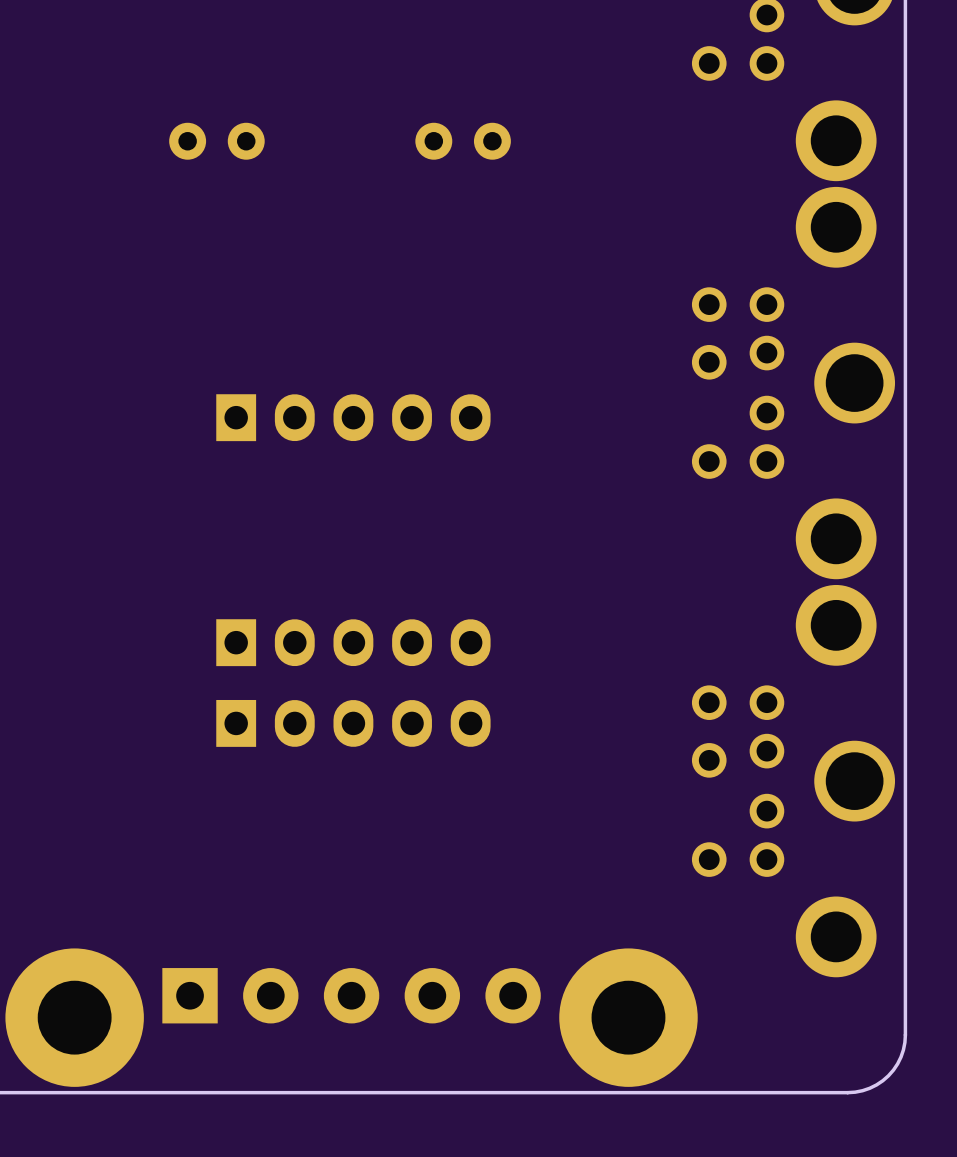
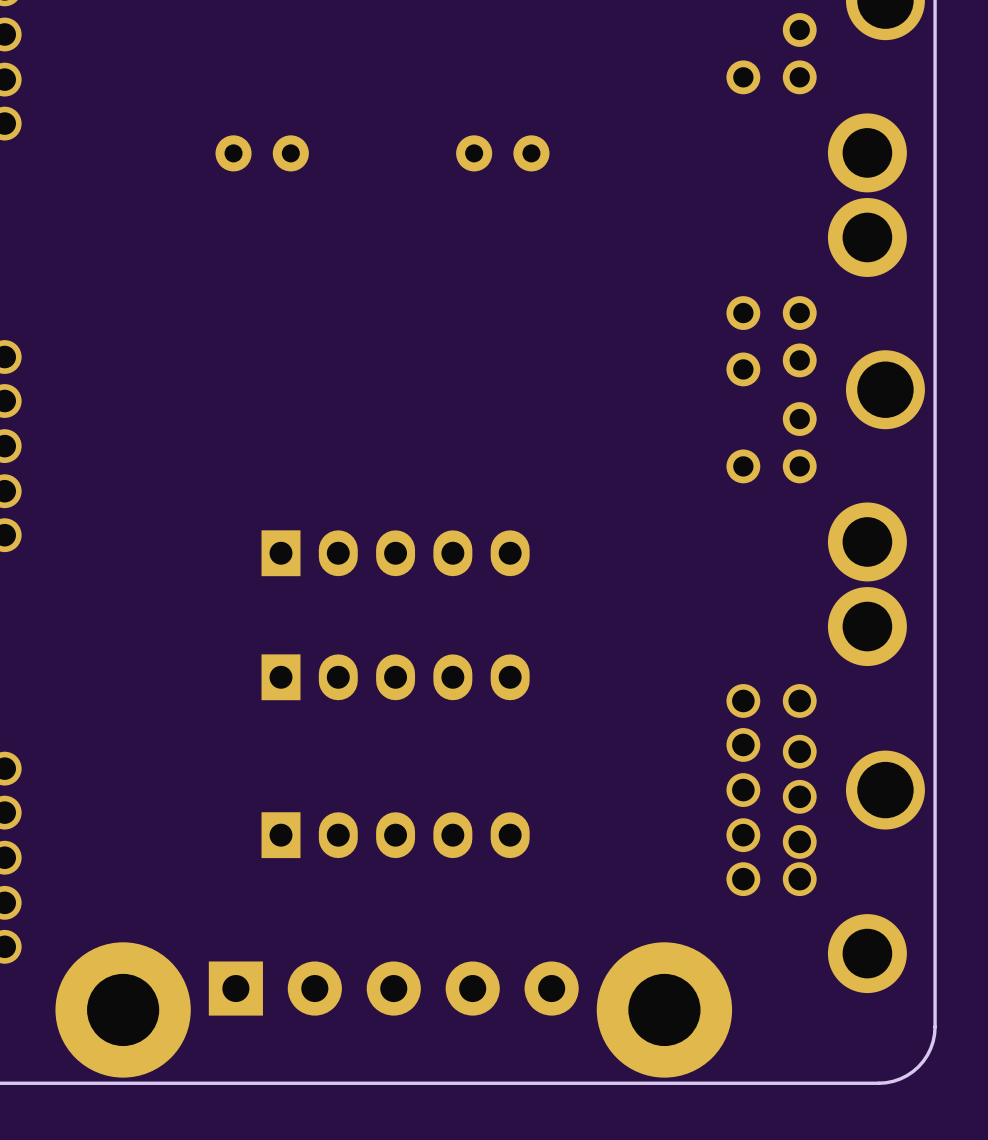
part: (353, 417) -> none
part: none -> (395, 553)
part footprint: [691, 584, 896, 978] -> [726, 587, 925, 994]
part: (353, 642) -> none
part: none -> (395, 677)
part: (353, 723) -> none
part: none -> (395, 835)

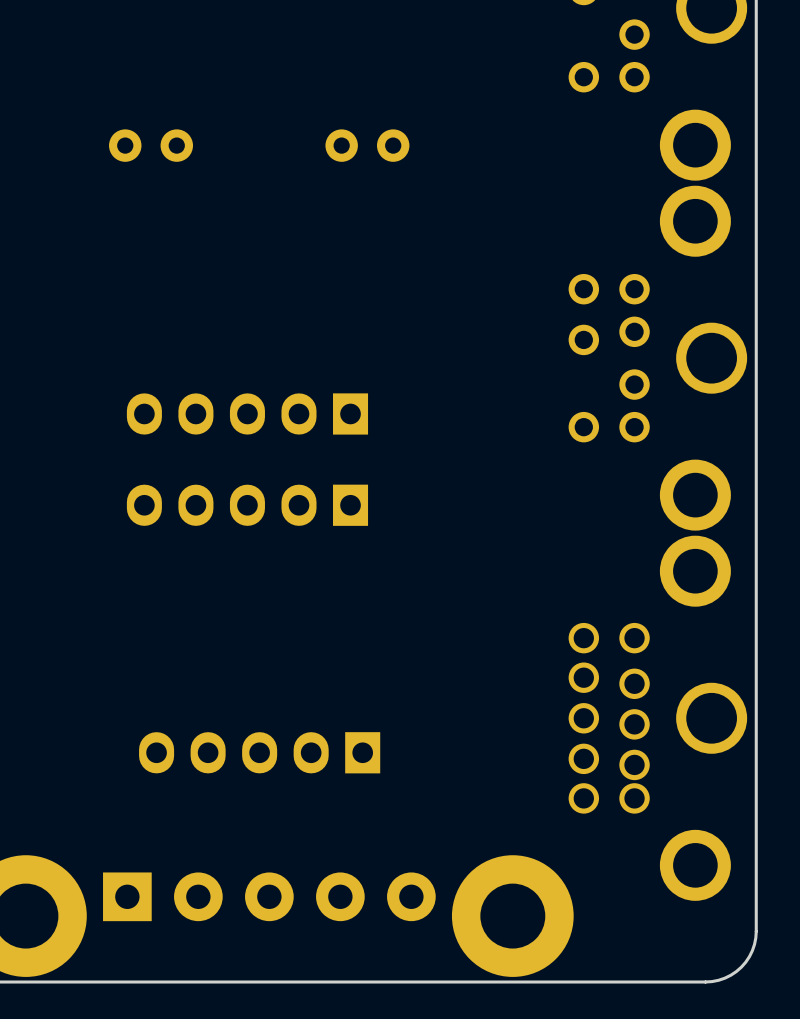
part: none -> (247, 413)
part rotation: 0° (395, 553) -> 180° (247, 505)
part: (395, 677) -> none
part rotation: 0° (395, 835) -> 180° (259, 752)

